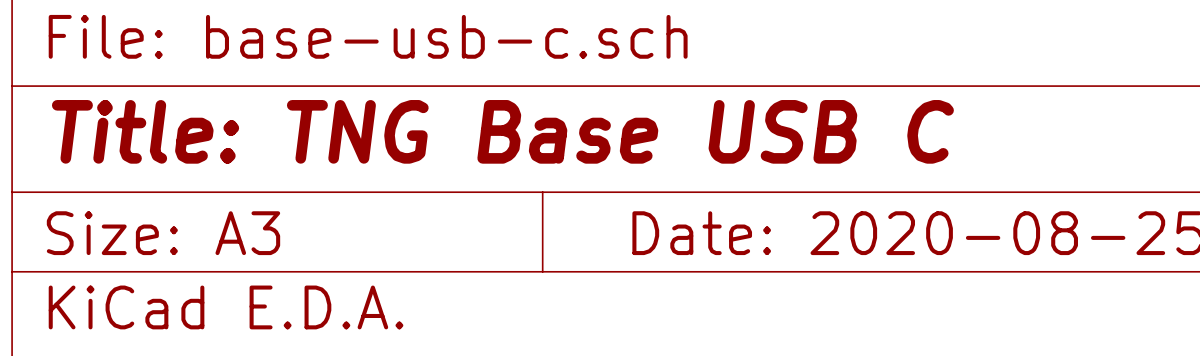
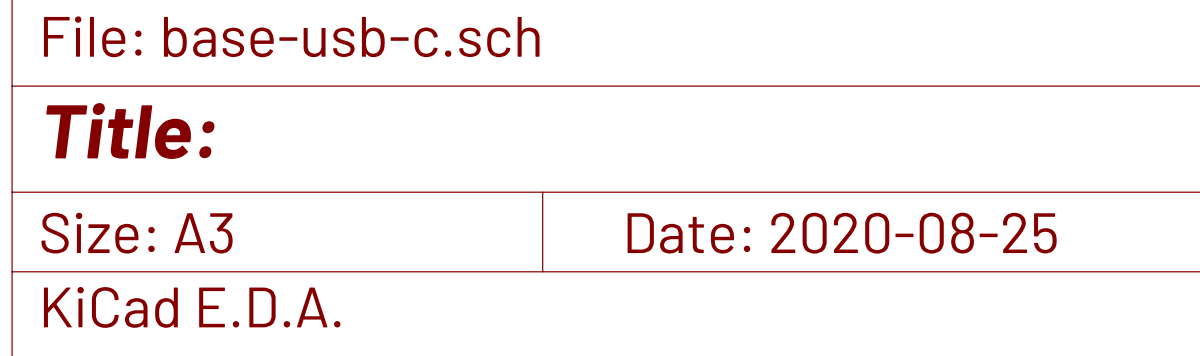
title block: Title: TNG Base USB C (502, 131) -> Title: (130, 131)

